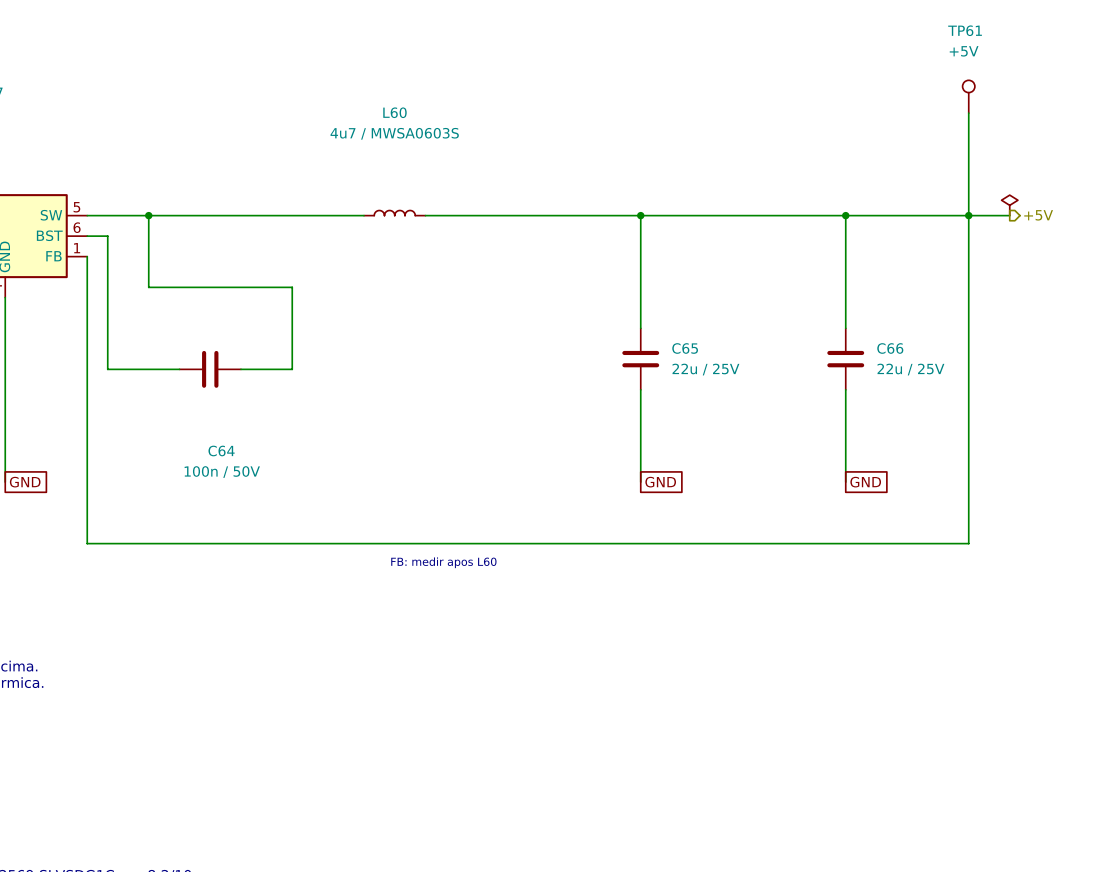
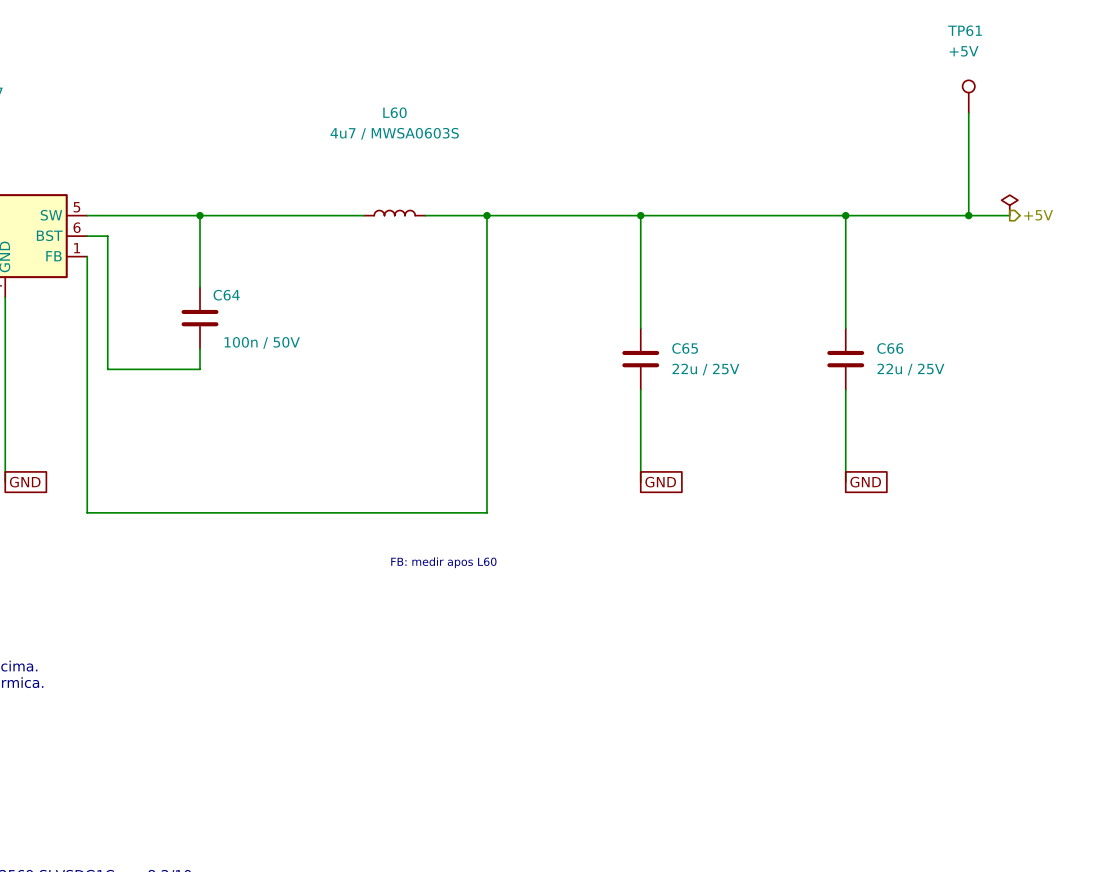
wire: (148, 215) (148, 287) (292, 287) (292, 369) (241, 369) -> none
junction: (148, 215) -> none
wire: none -> (200, 215) (200, 287)
junction: none -> (200, 215)
junction: none -> (486, 215)
wire: (968, 215) (968, 543) (87, 543) (87, 512) -> (486, 215) (486, 512) (87, 512)
wire: none -> (200, 348) (200, 369) (179, 369)
C64 rotation: 0° (210, 369) -> 90° clockwise (200, 318)
C64 position: (210, 369) -> (200, 318)
C64 name position: C64 (221, 450) -> C64 (226, 295)
C64 value position: 100n / 50V (222, 472) -> 100n / 50V (262, 342)

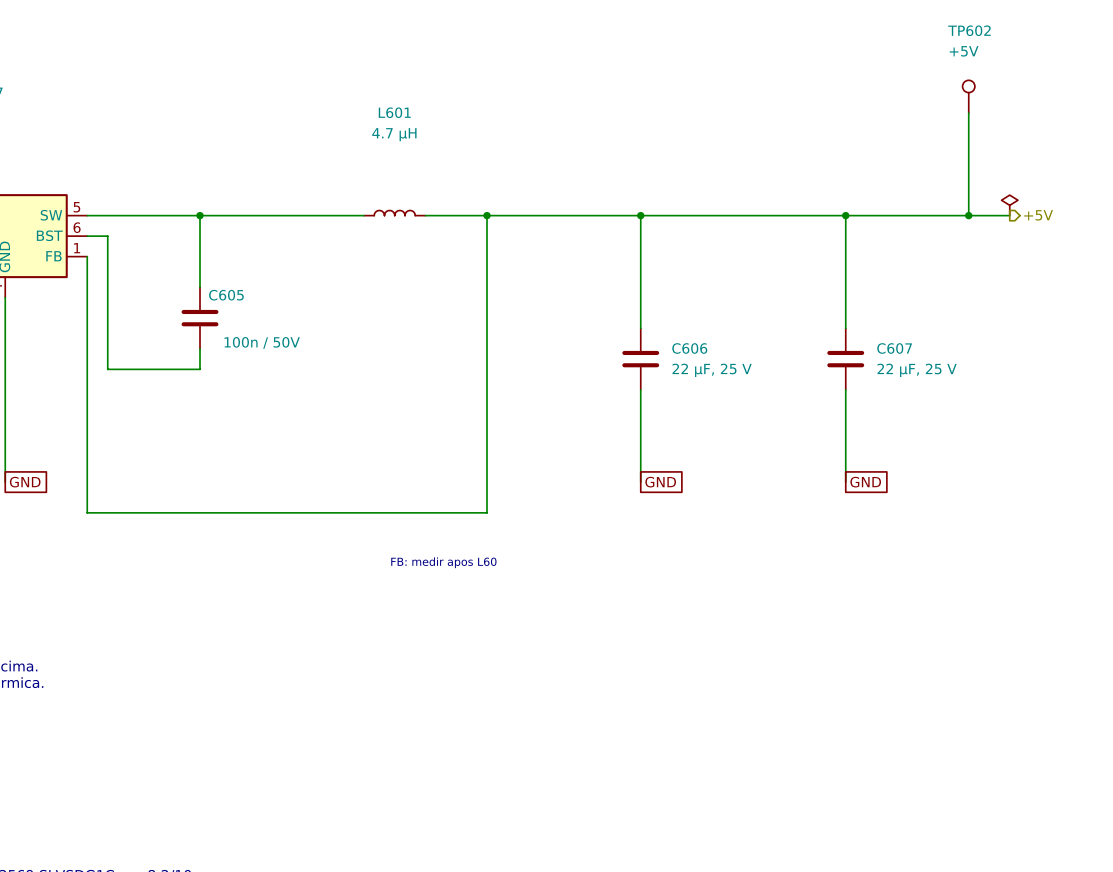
TP61 name: TP61 (965, 30) -> TP602 (969, 30)
L60 name: L60 (394, 112) -> L601 (394, 112)
L60 value: 4u7 / MWSA0603S (394, 133) -> 4.7 µH (394, 134)
C64 name: C64 (226, 295) -> C605 (226, 295)
C65 name: C65 (685, 348) -> C606 (689, 348)
C66 name: C66 (890, 348) -> C607 (894, 348)
C65 value: 22u / 25V (705, 369) -> 22 µF, 25 V (712, 370)
C66 value: 22u / 25V (910, 369) -> 22 µF, 25 V (917, 370)

